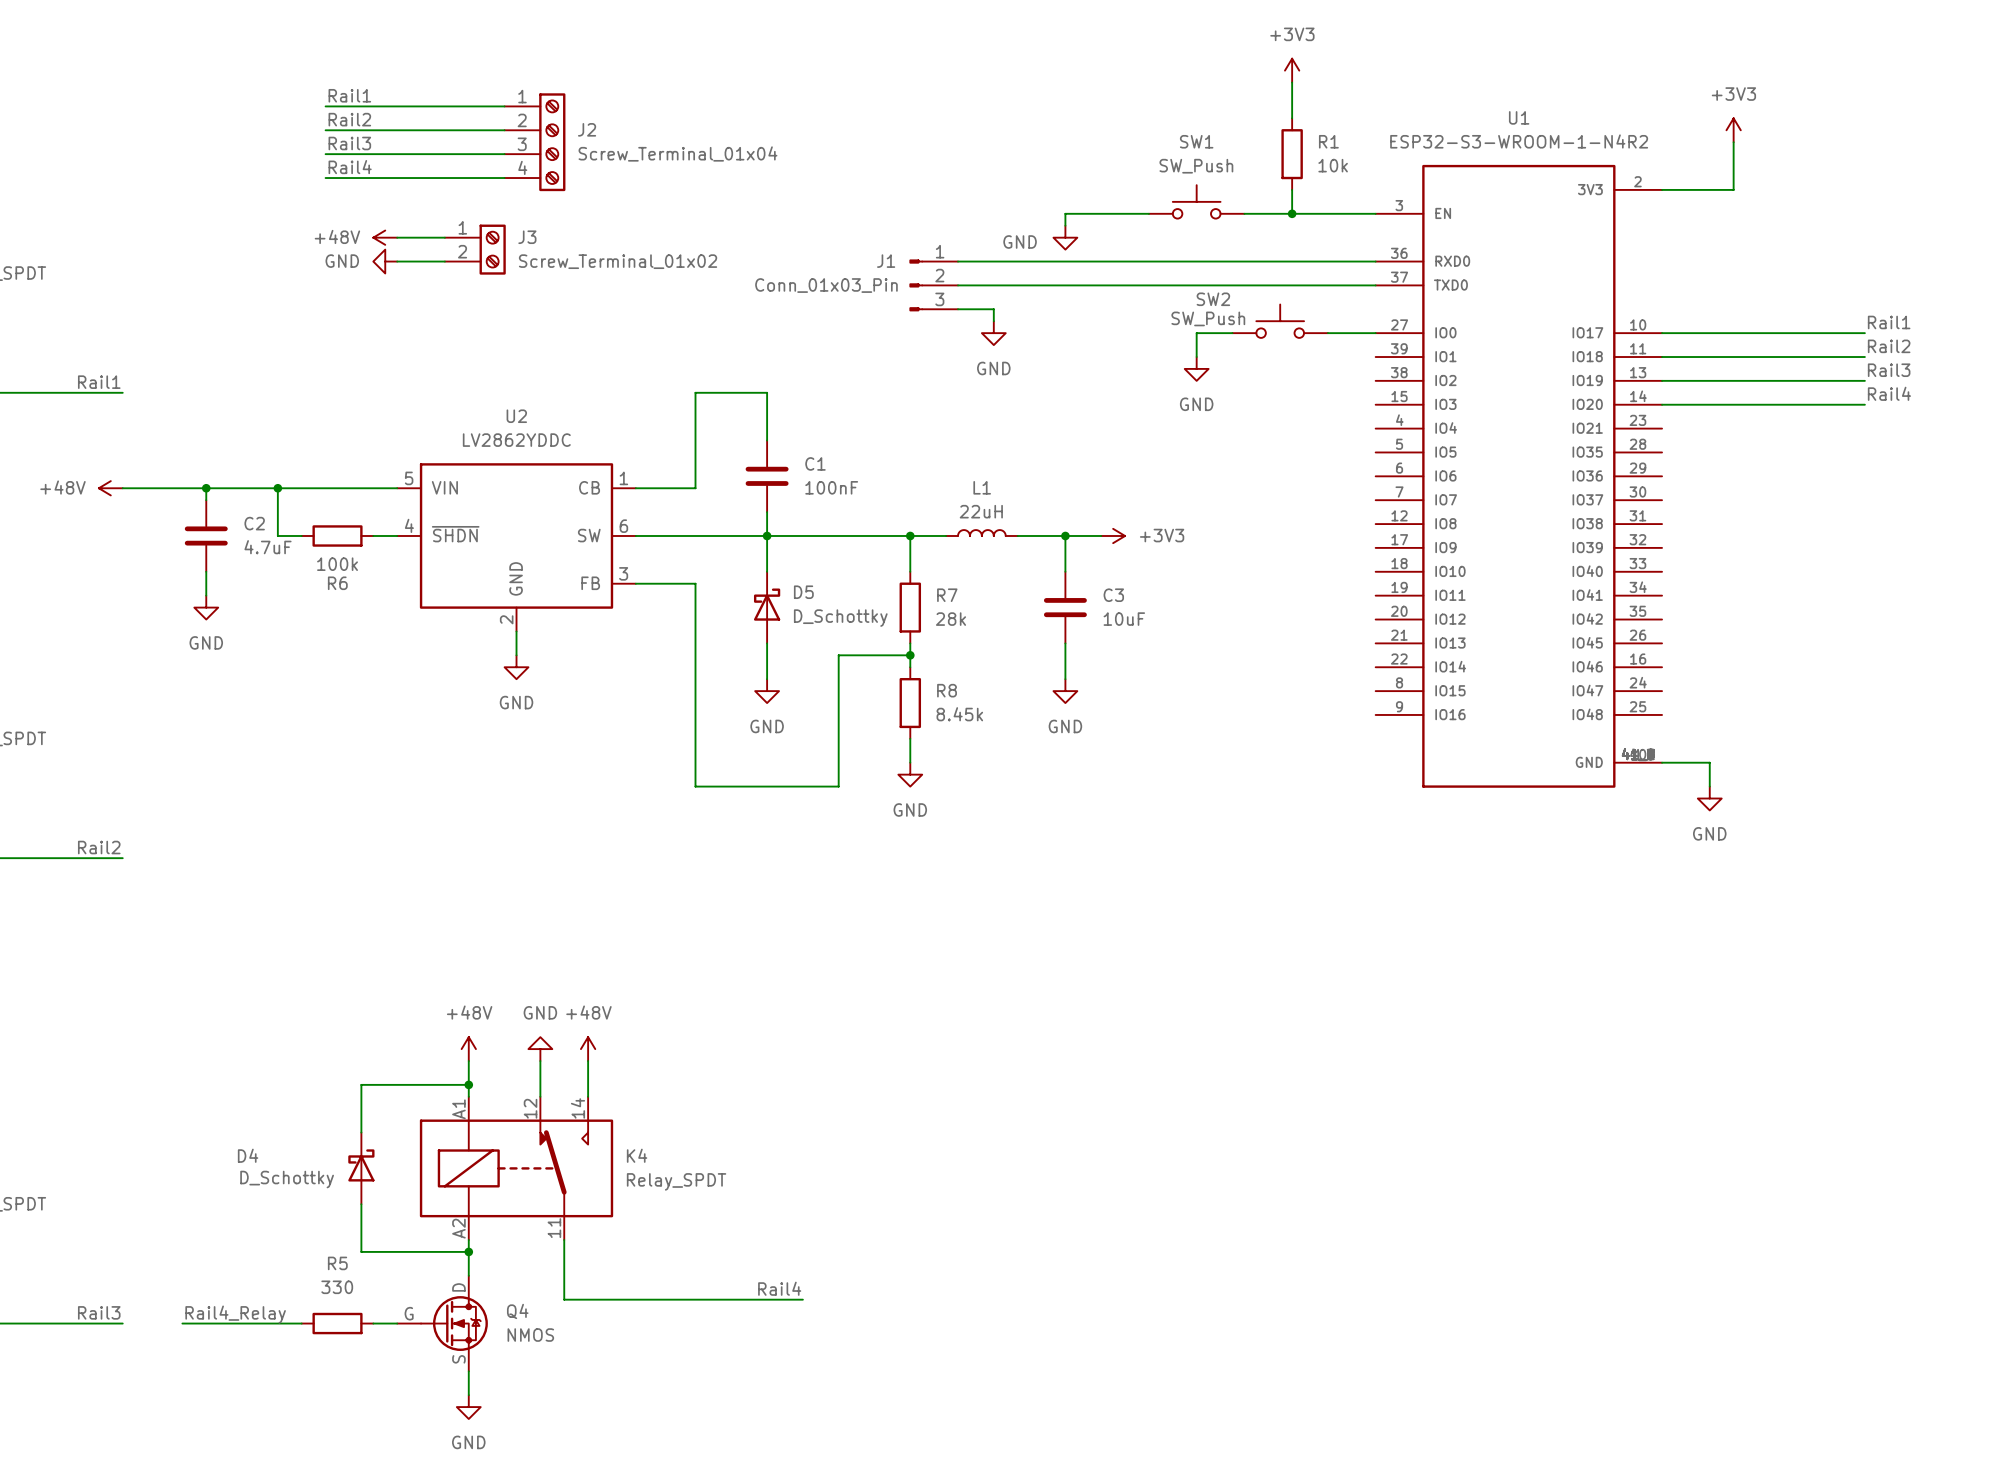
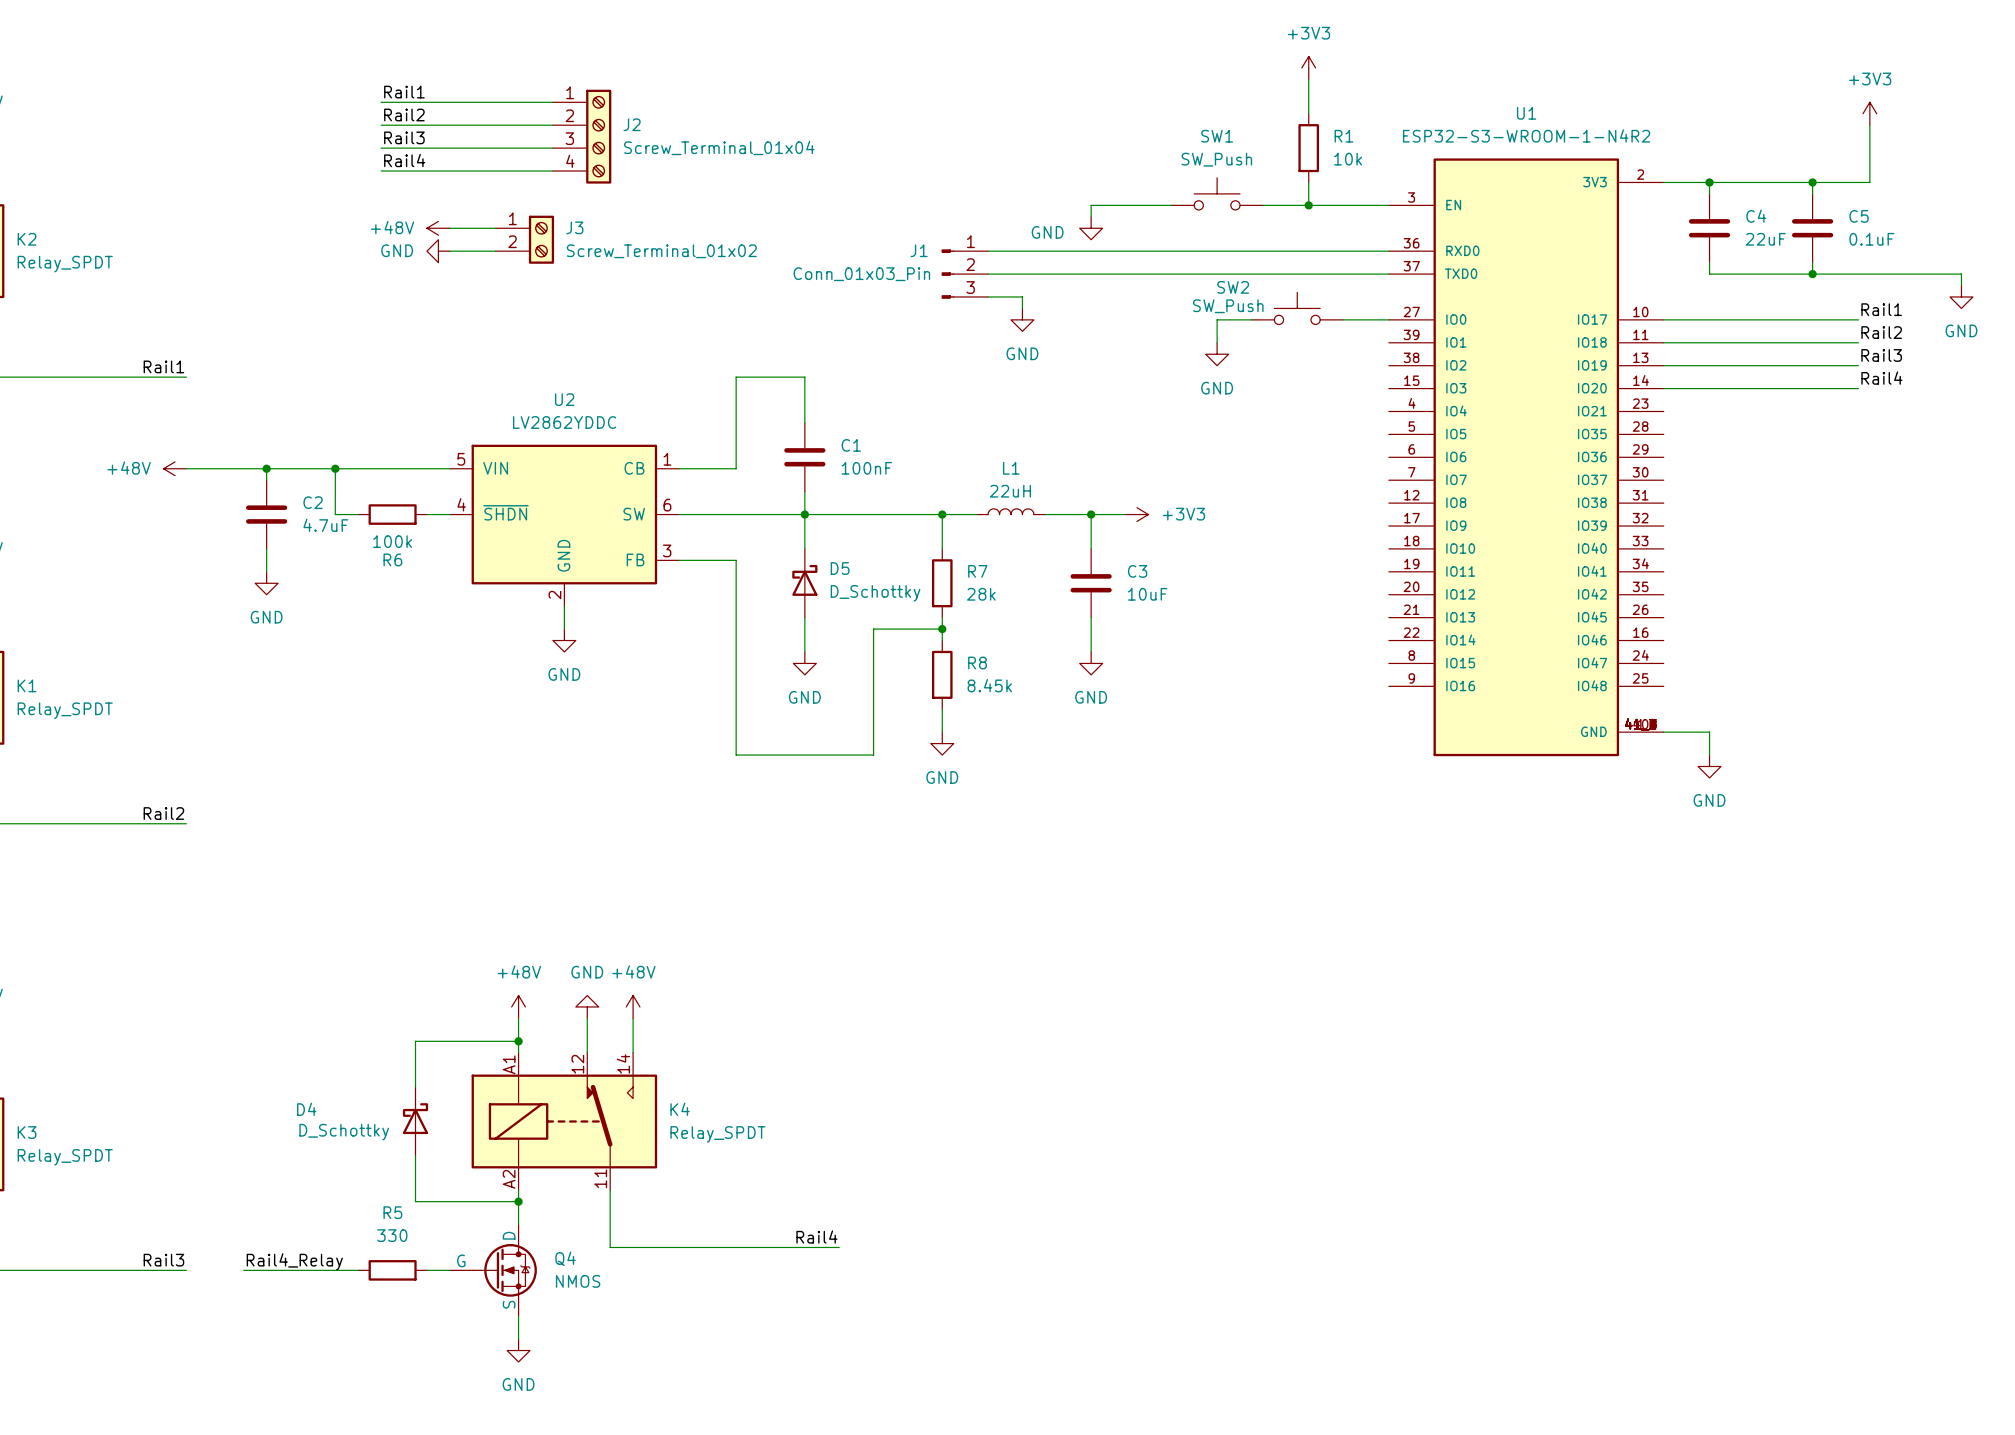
power symbol position: +3V3 (1733, 130) -> +3V3 (1869, 113)
wire: (1733, 142) (1733, 189) -> (1869, 125) (1869, 182) (1732, 182)
wire: none -> (1709, 182) (1709, 193)
junction: none -> (1709, 182)
wire: none -> (1812, 182) (1812, 193)
junction: none -> (1812, 182)
C4: none -> 22uF (1709, 228)
C5: none -> 0.1uF (1812, 228)
wire: none -> (1709, 262) (1709, 274) (1961, 274) (1961, 285)
wire: none -> (1812, 262) (1812, 274)
junction: none -> (1812, 274)
power symbol: none -> GND (1961, 296)

